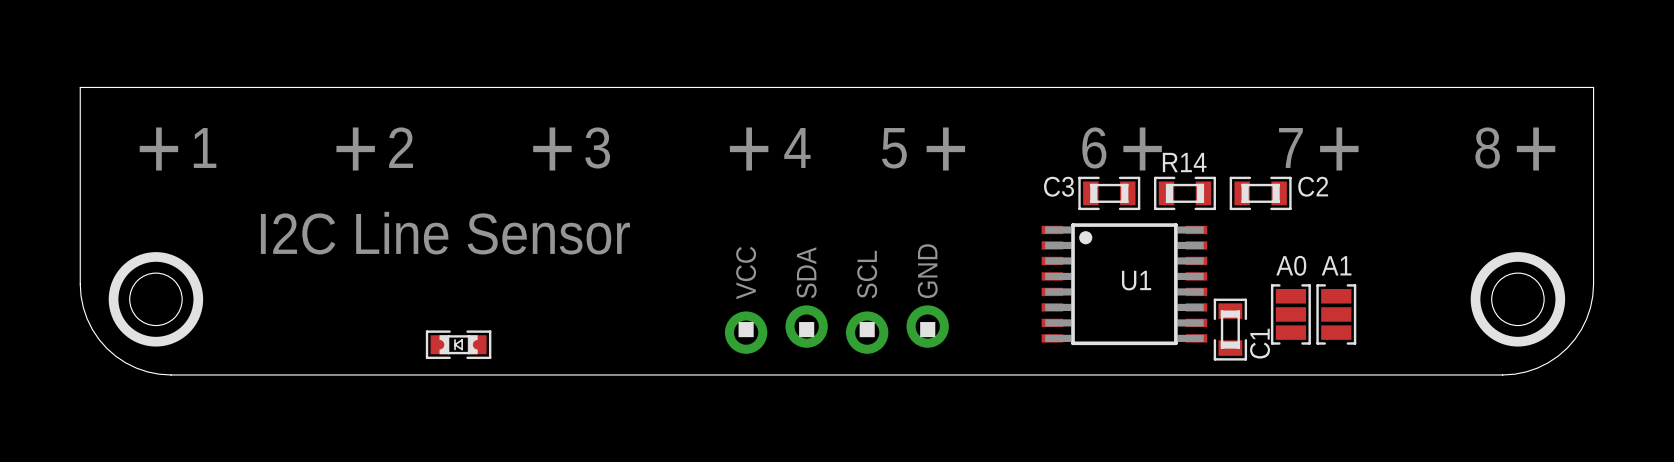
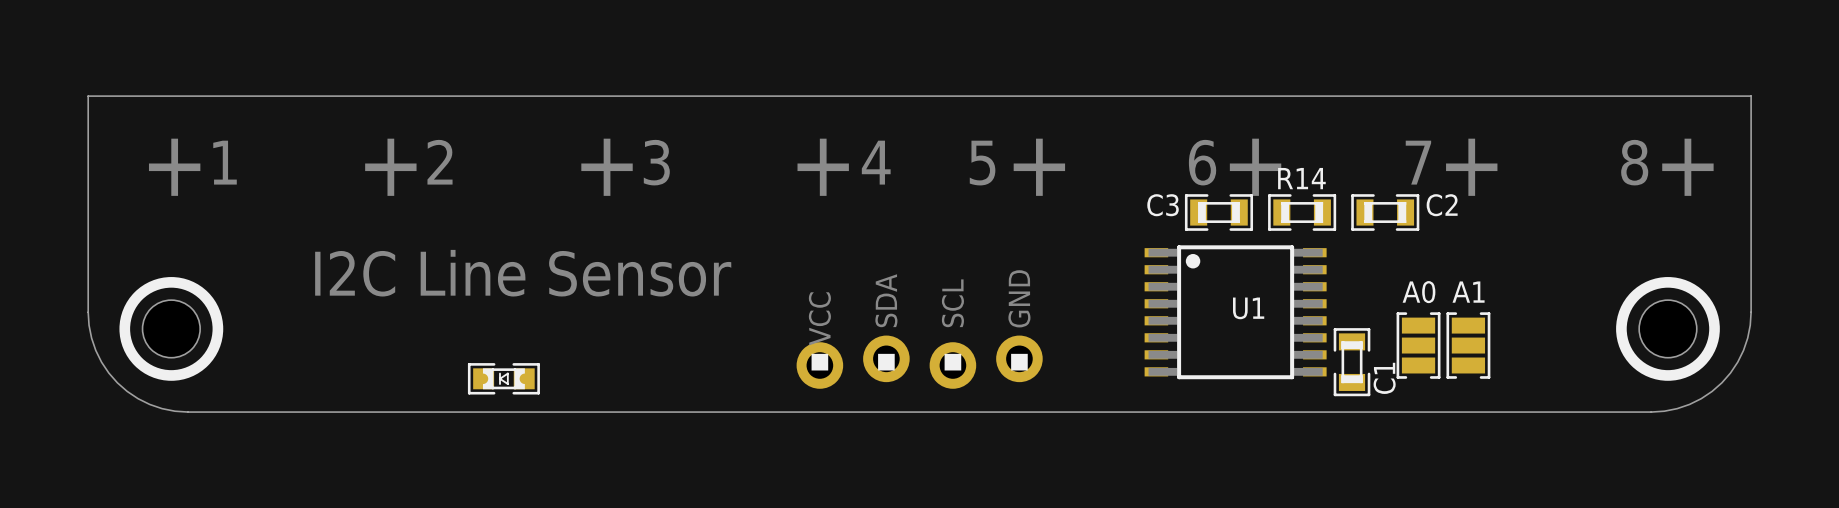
text position: I2C Line Sensor (445, 233) -> I2C Line Sensor (523, 273)
text position: VCC (746, 273) -> VCC (819, 318)

